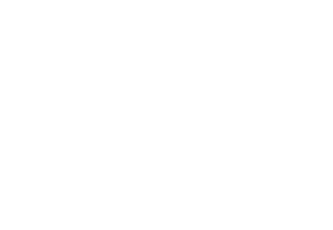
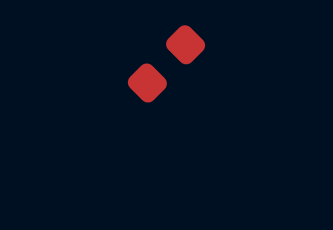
part: none -> (166, 63)

